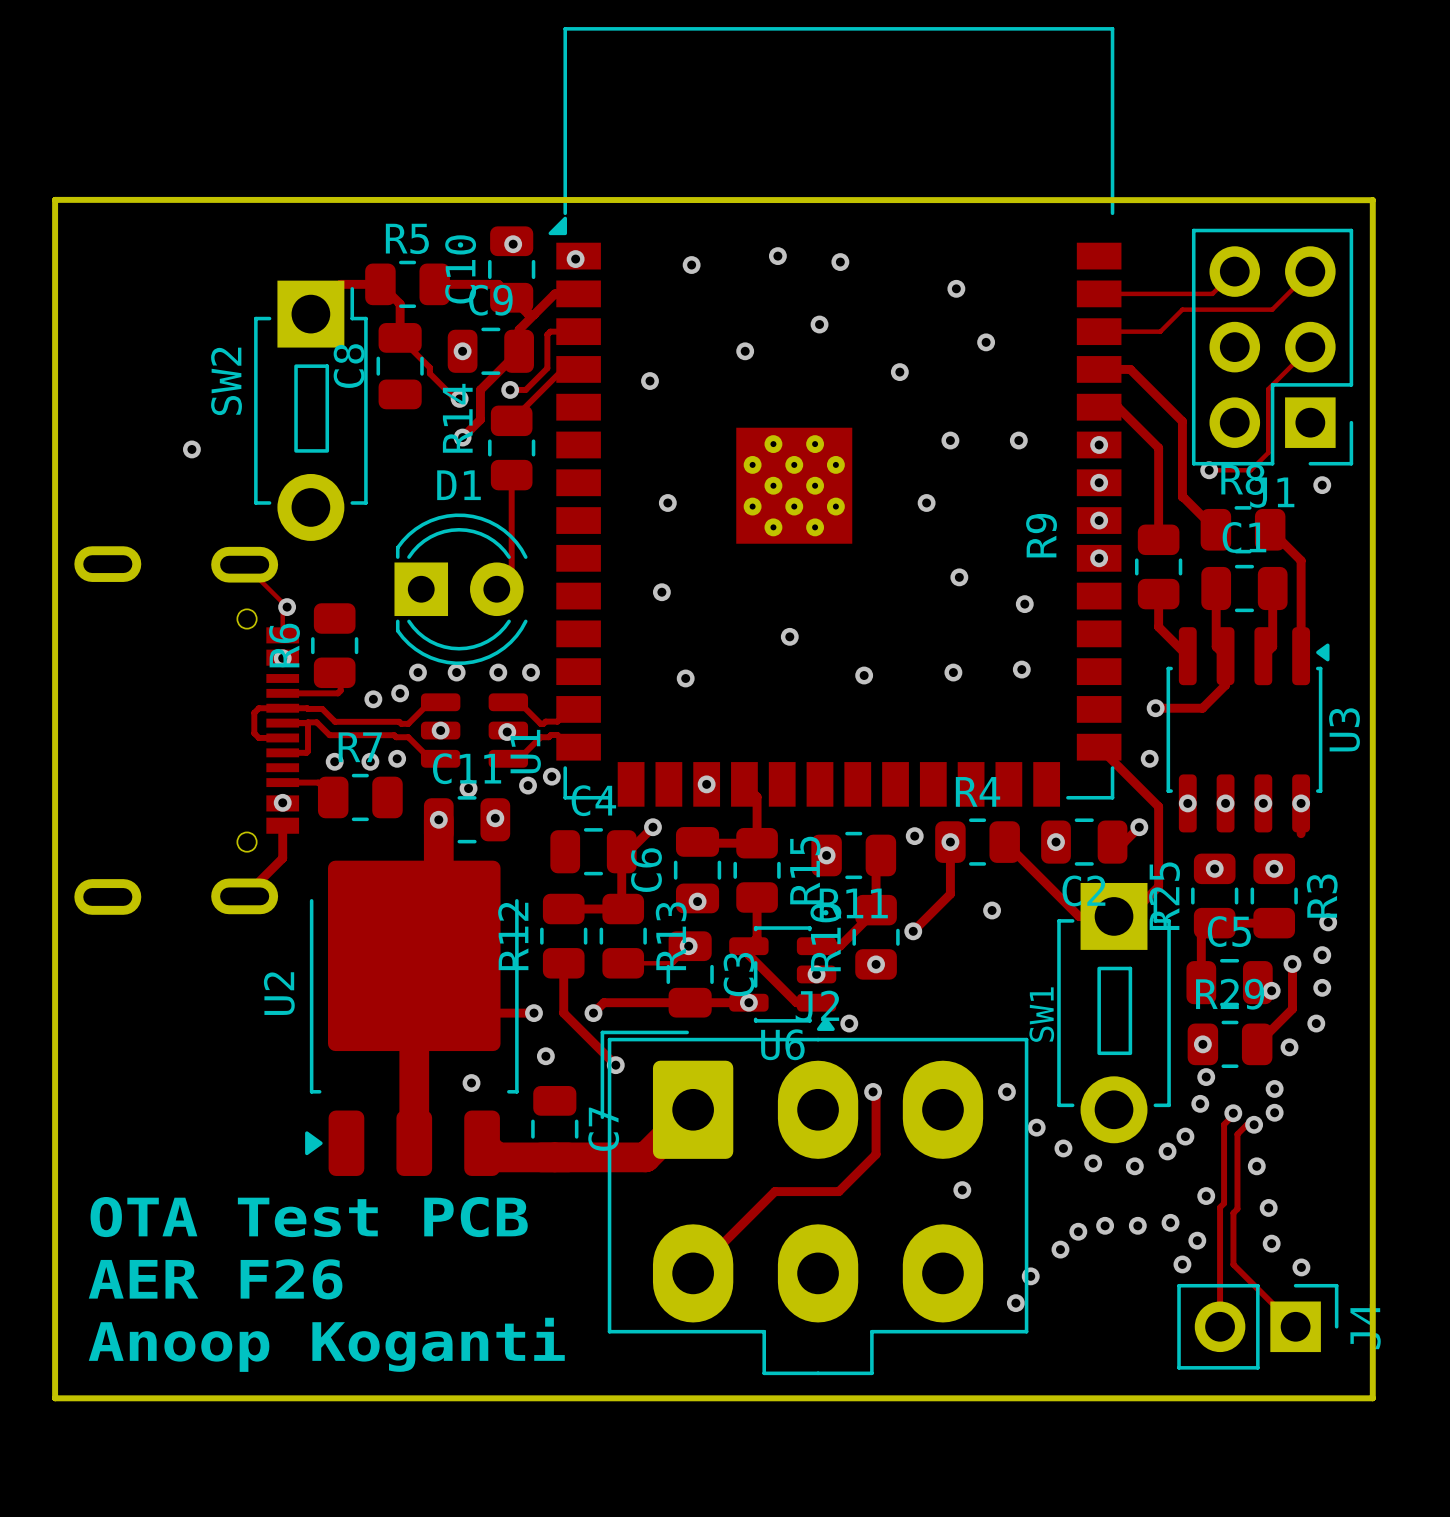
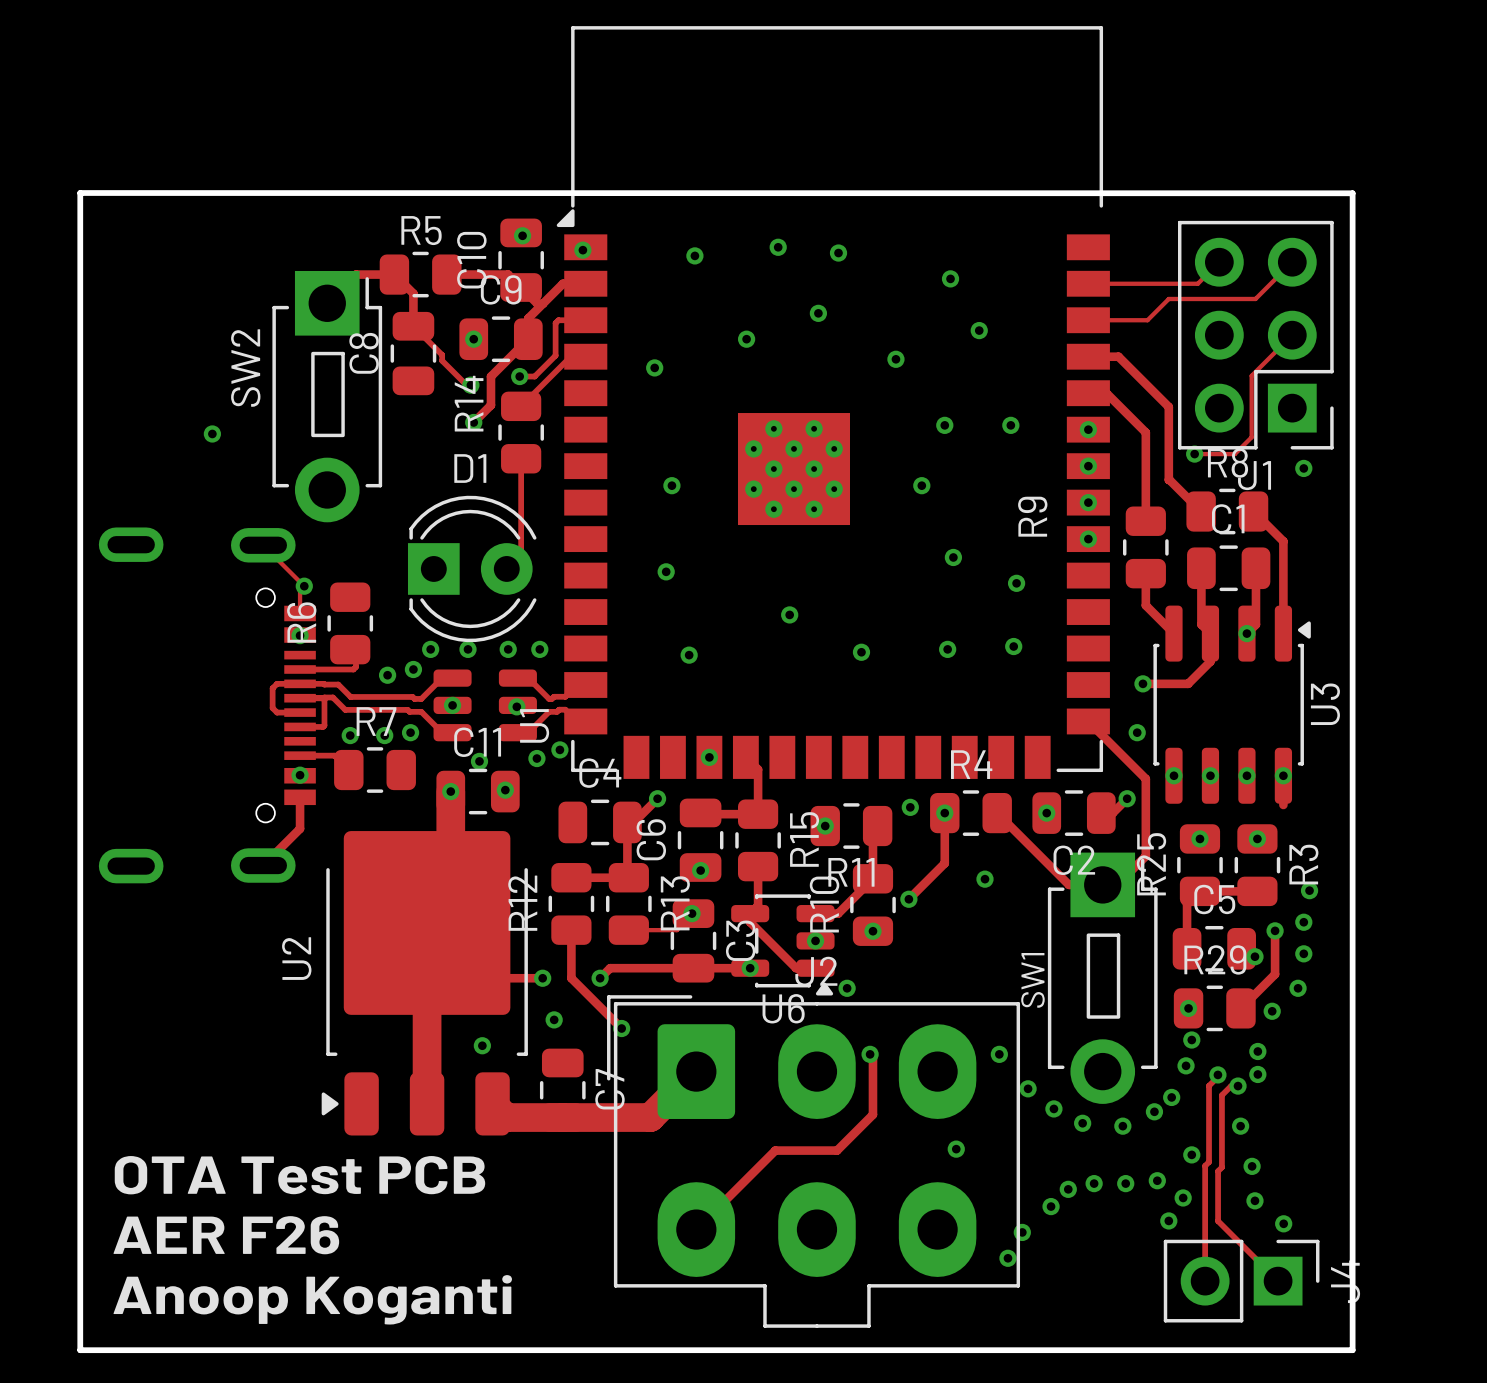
via: none -> (1246, 633)

